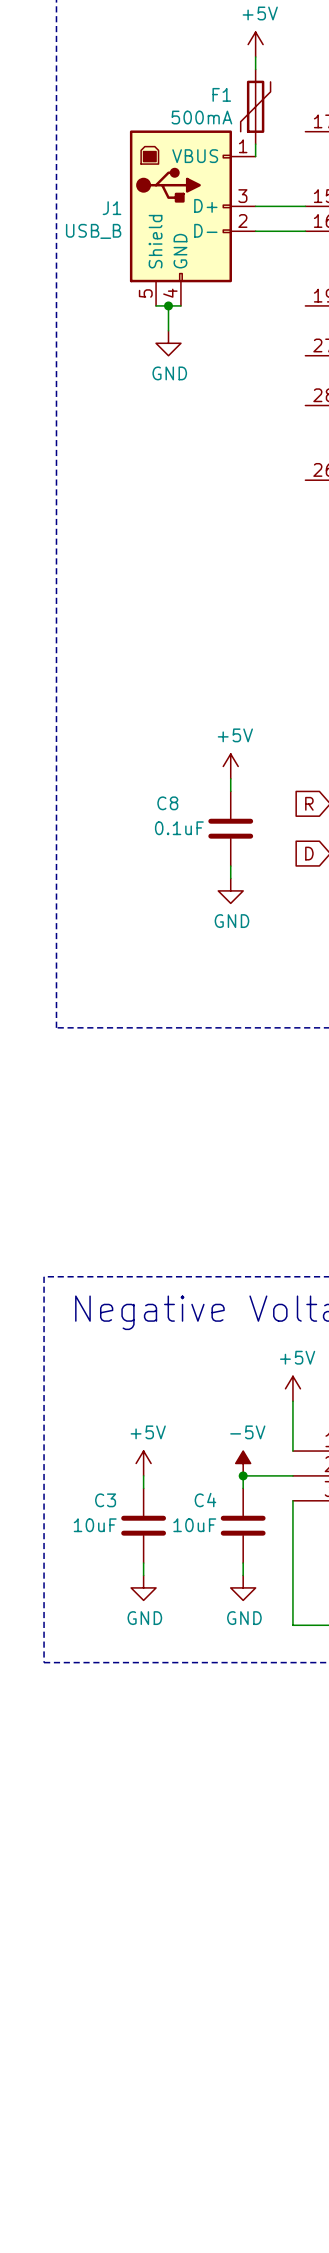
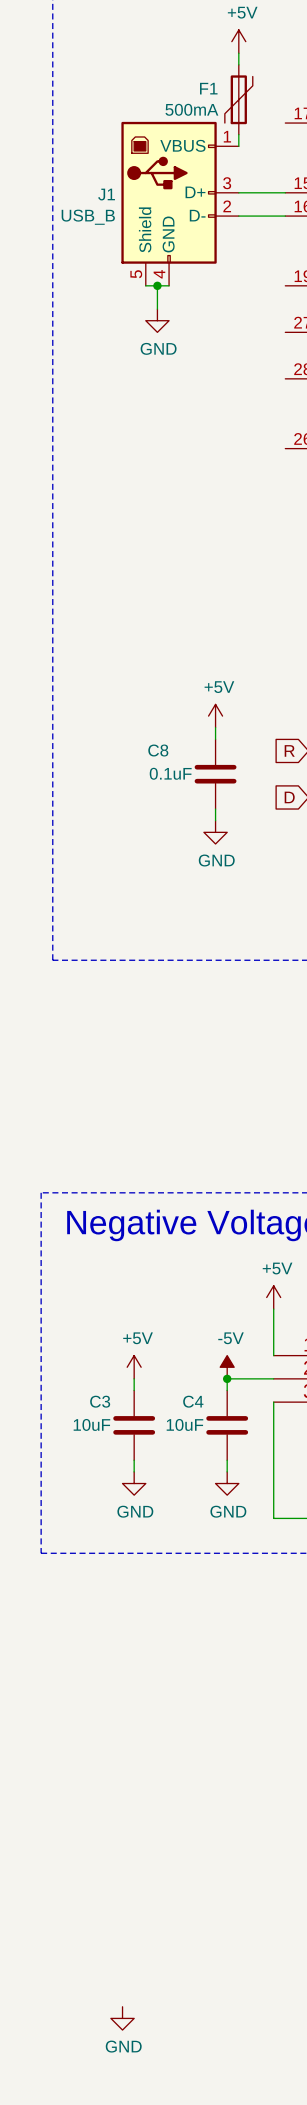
power symbol: none -> GND (122, 2018)

